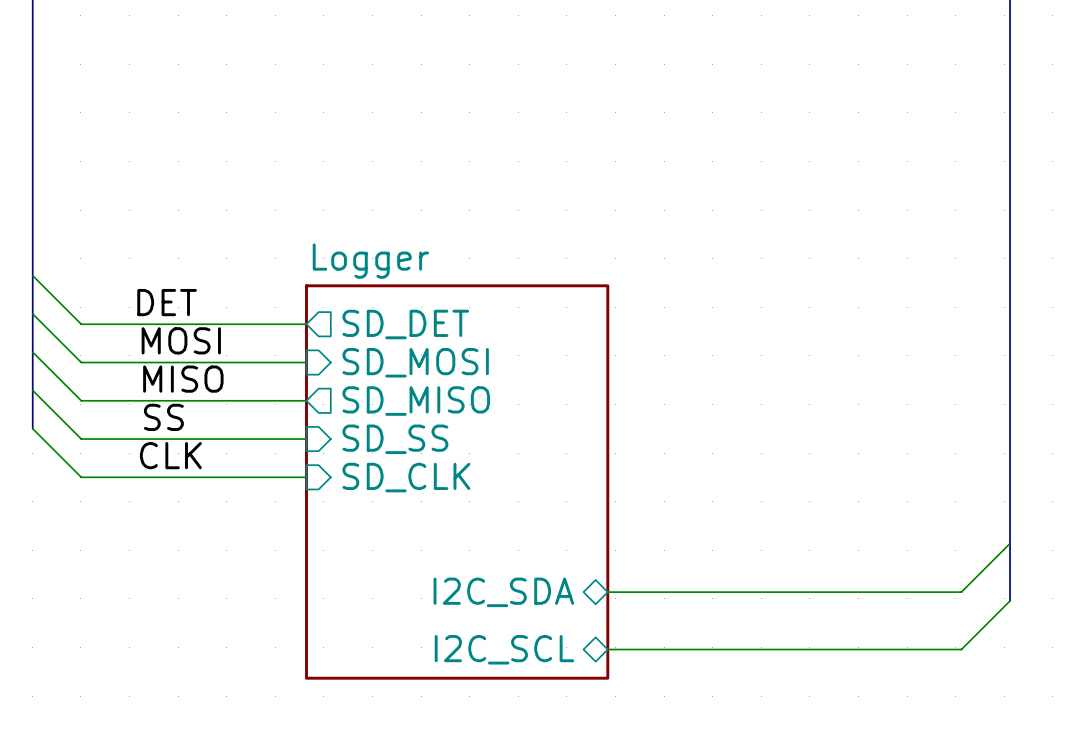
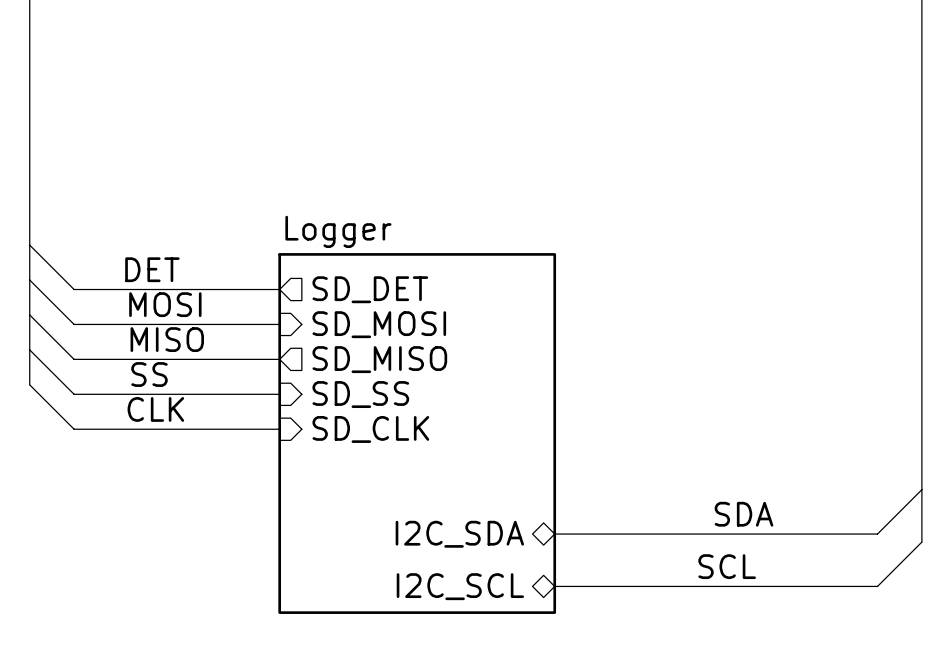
label: none -> SDA (744, 514)
label: none -> SCL (727, 566)

